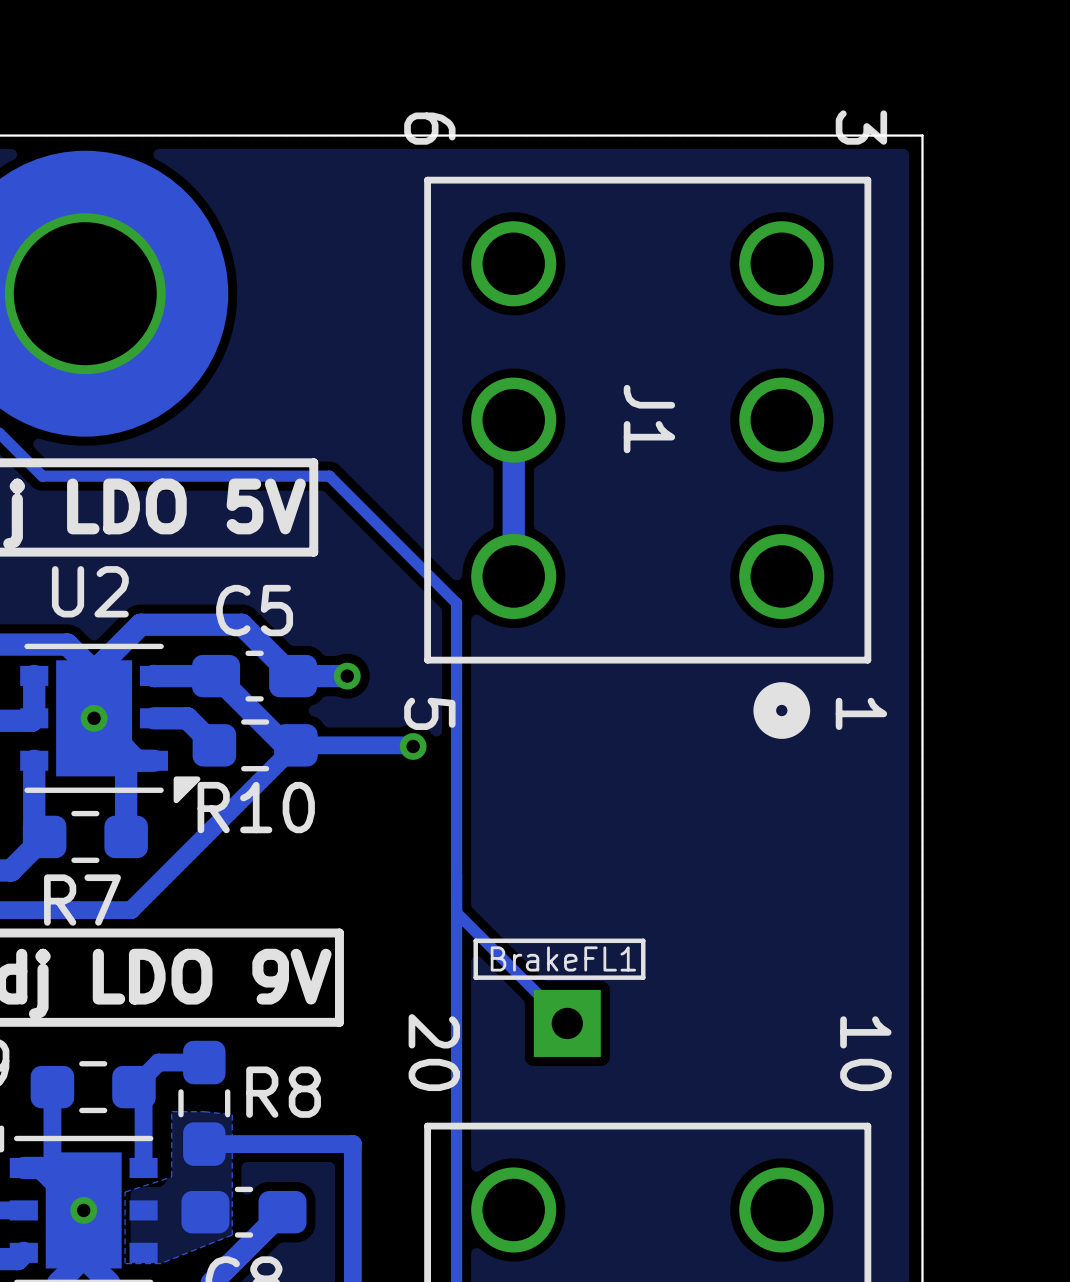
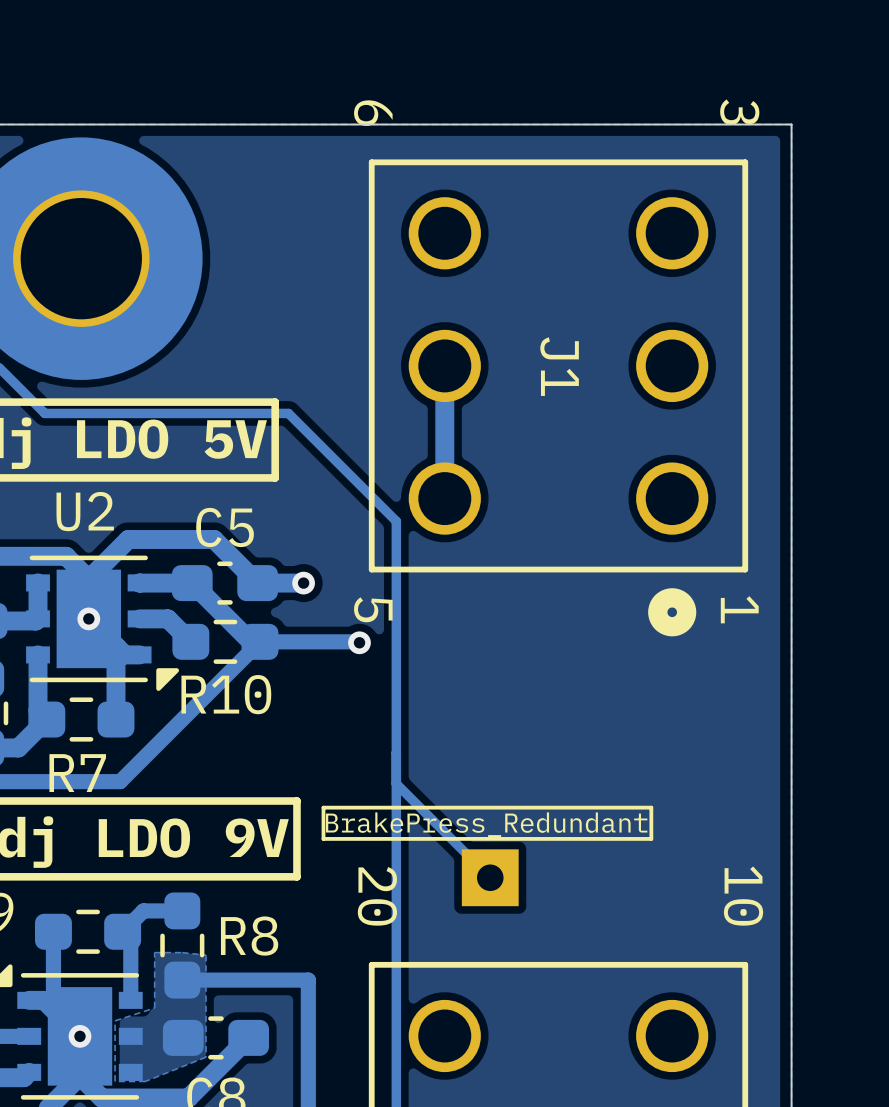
line: (475, 940) (475, 977) -> (412, 807) (323, 807) (323, 838) (412, 838)
line: (643, 940) (643, 977) -> (554, 807) (651, 807) (651, 838) (554, 838)
BrakeFL1 name: BrakeFL1 (563, 958) -> BrakePress_Redundant (486, 824)

